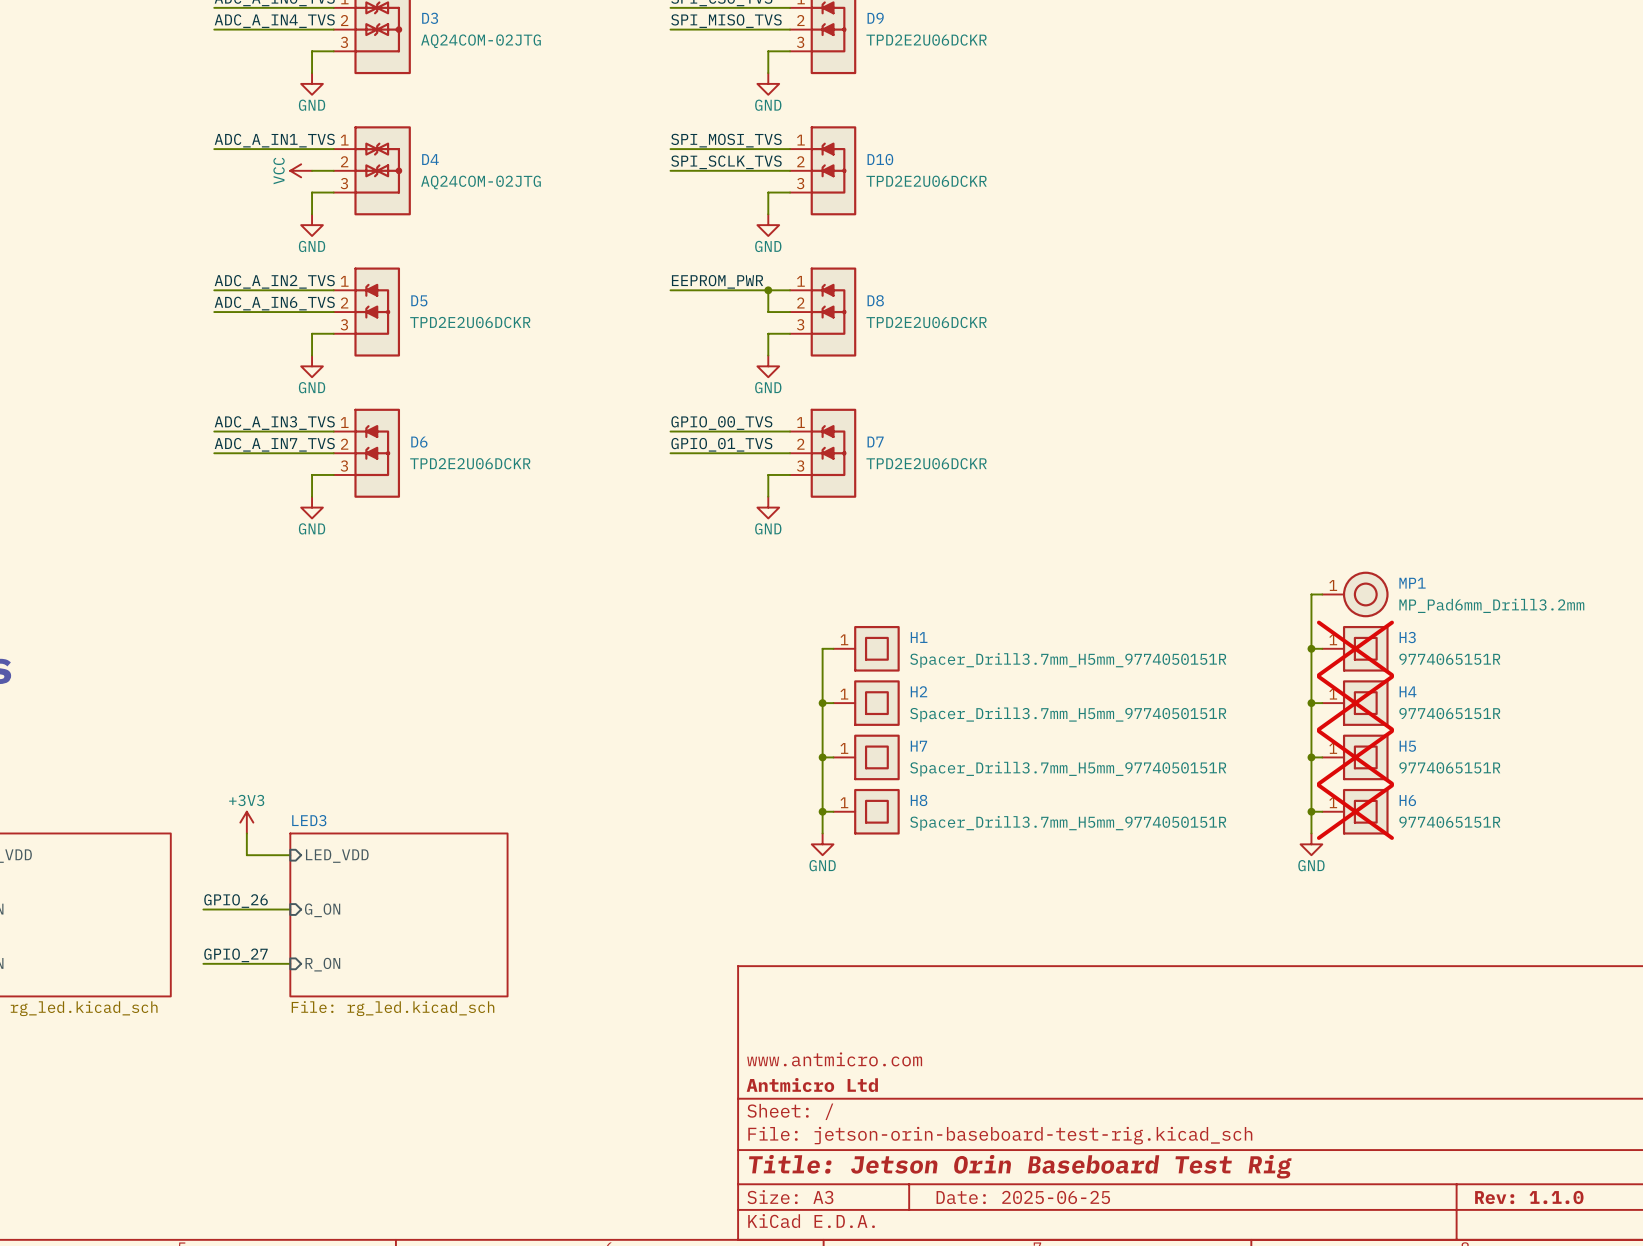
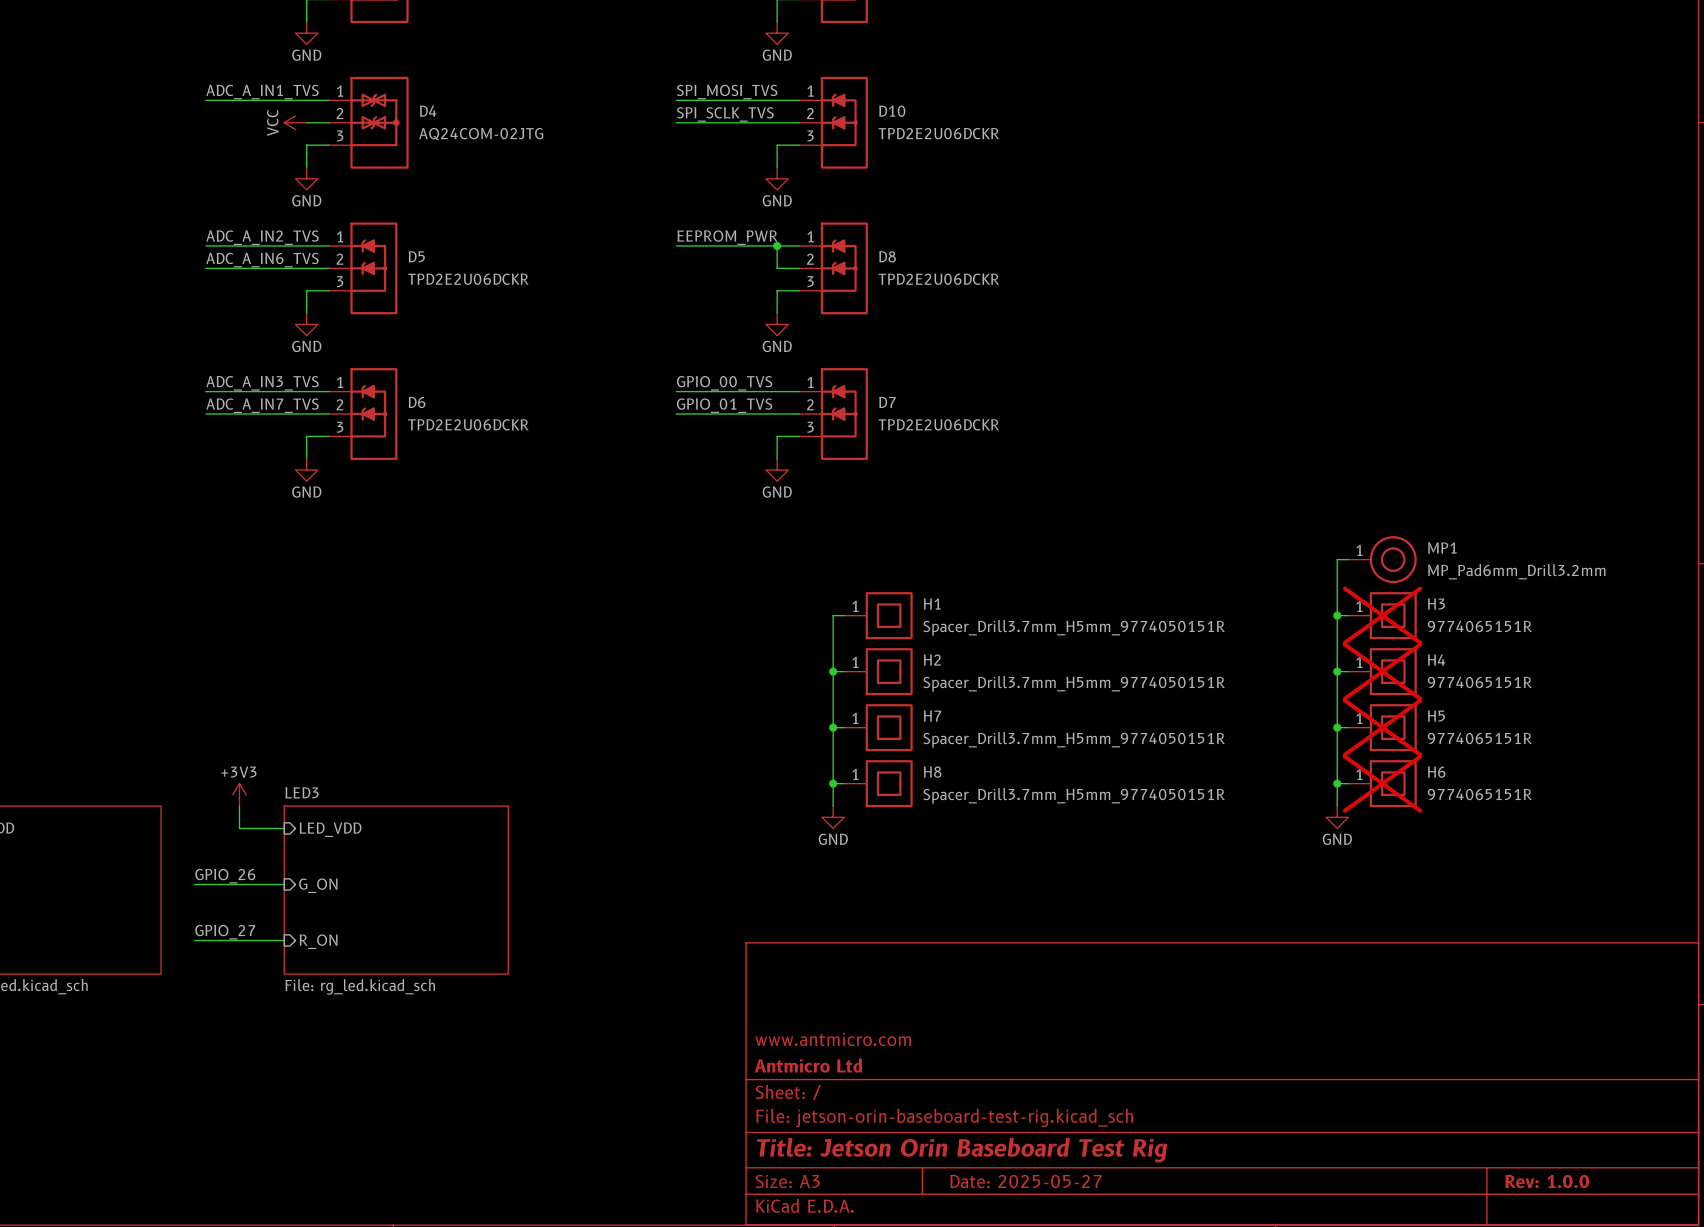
title block: Date: 2025-06-25 (1023, 1197) -> Date: 2025-05-27 (1026, 1181)
title block: Rev: 1.1.0 (1529, 1197) -> Rev: 1.0.0 (1547, 1181)

